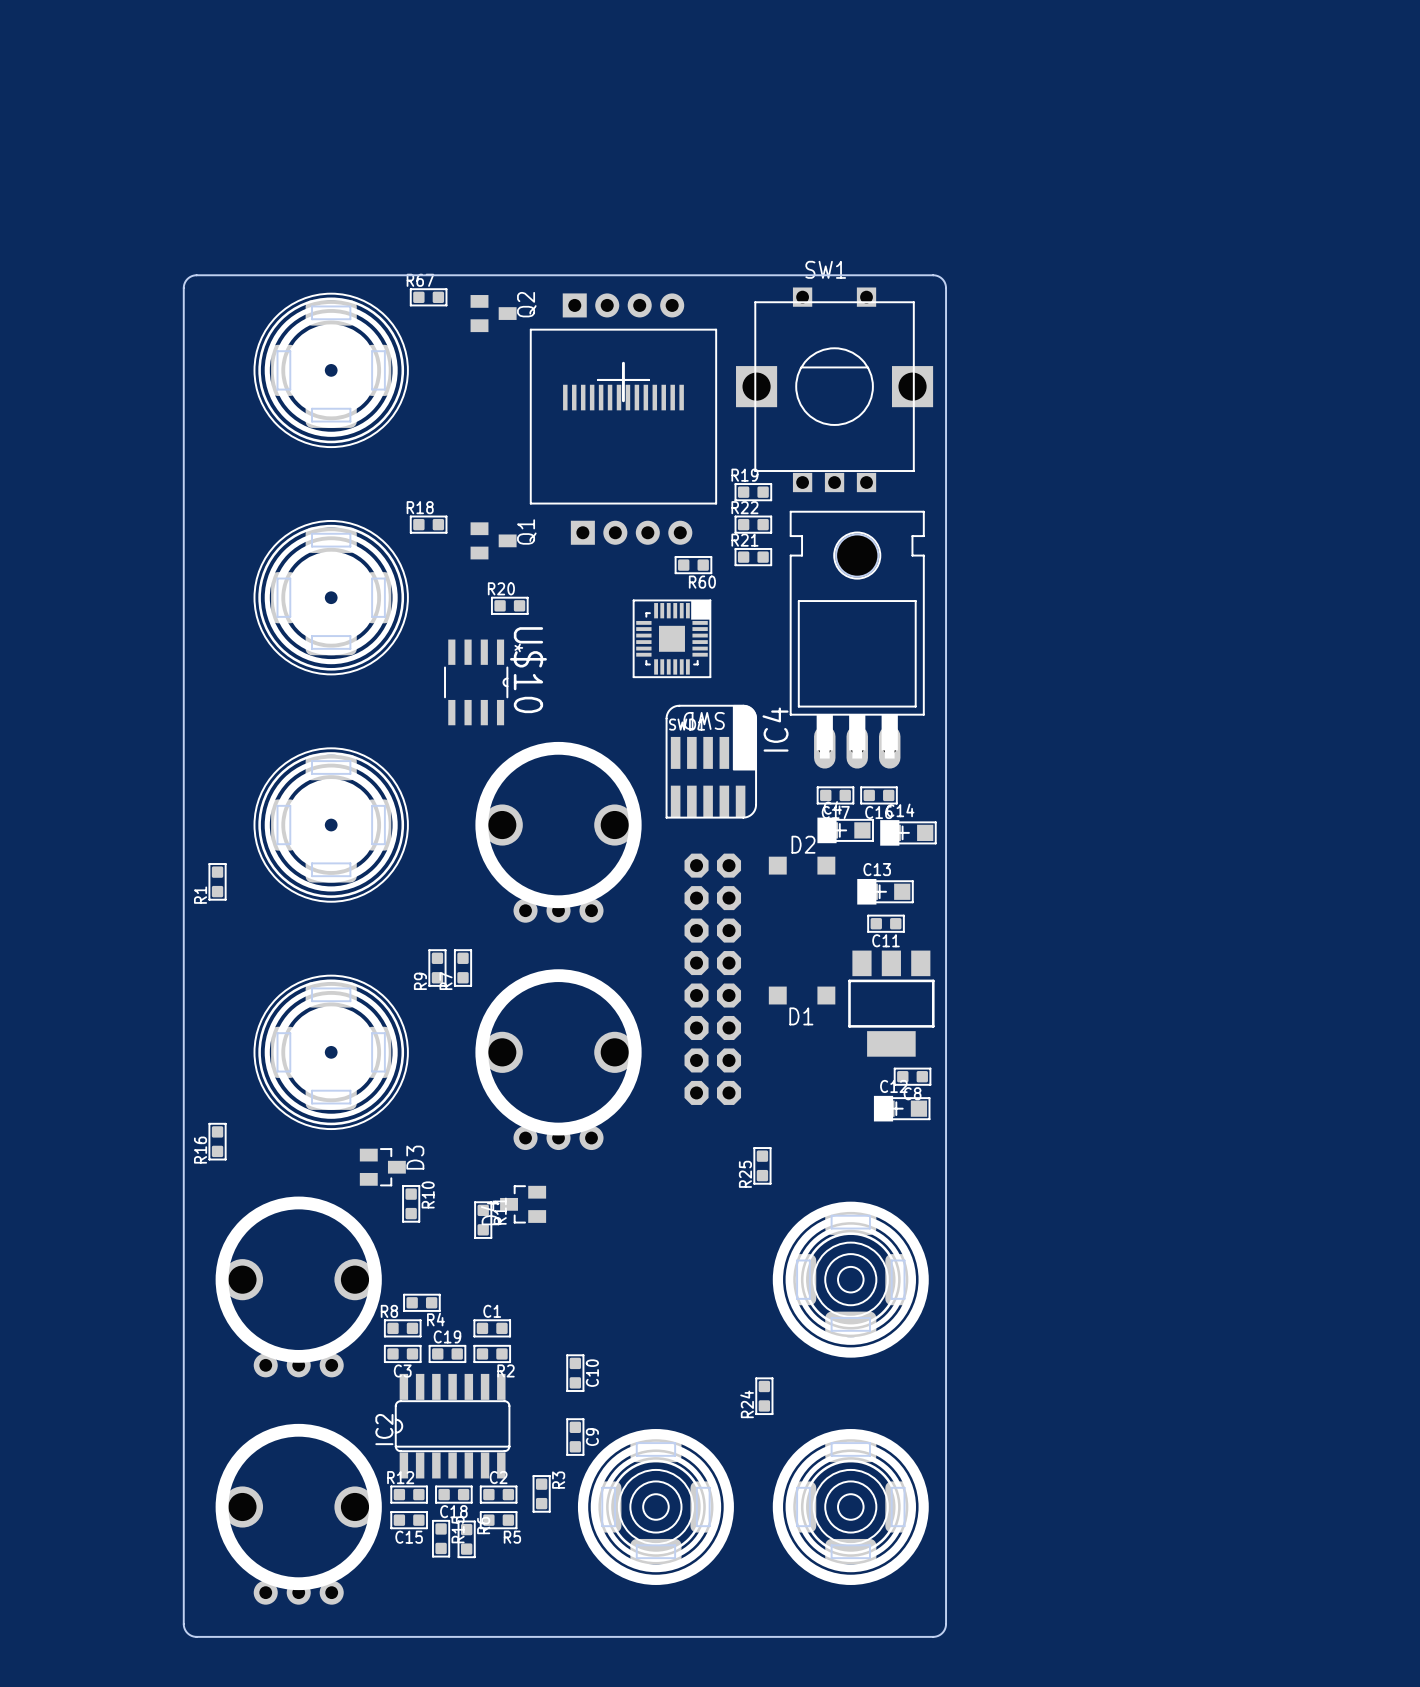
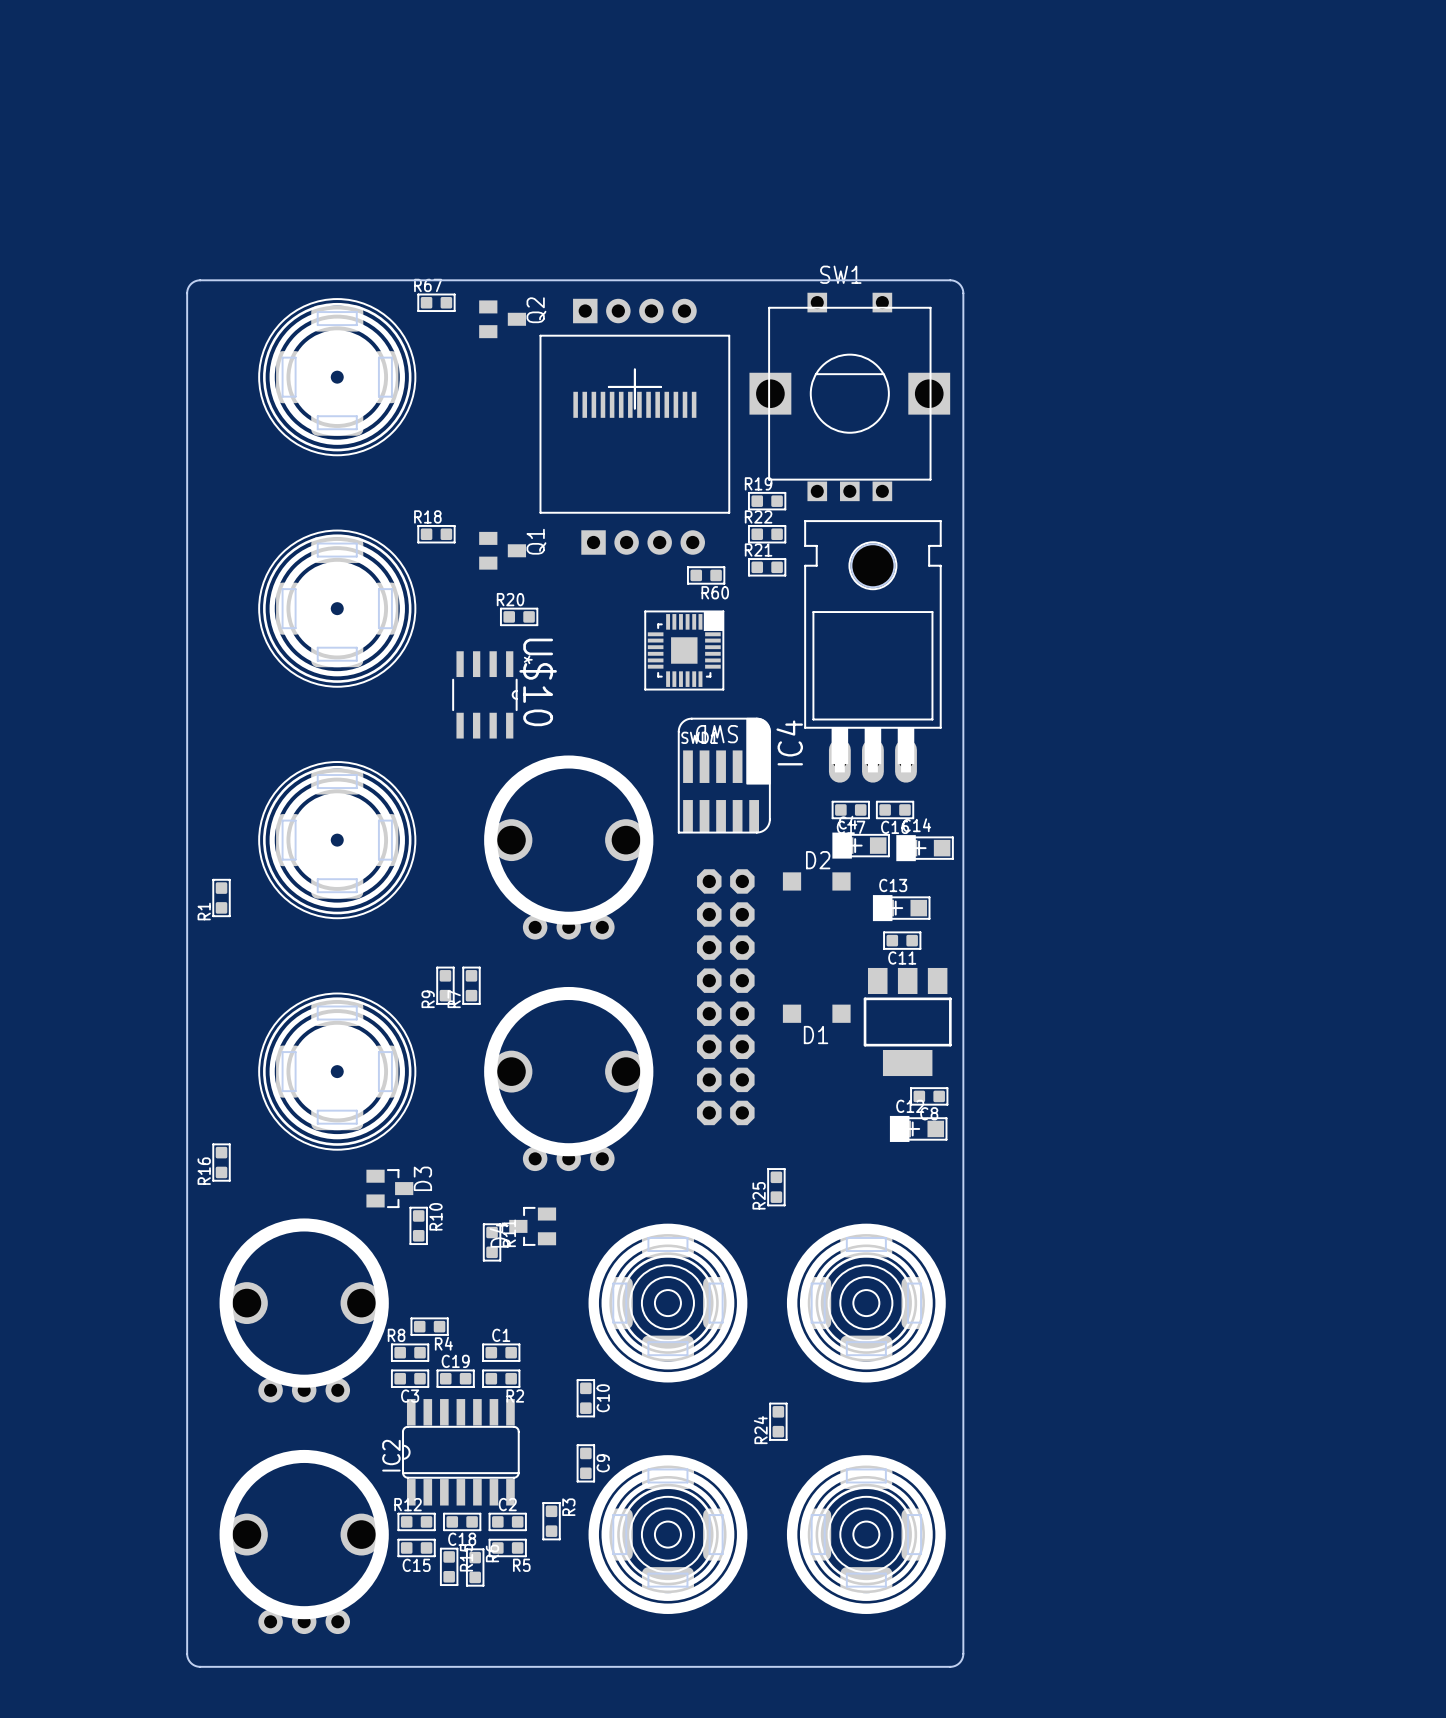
part: none -> (667, 1303)

